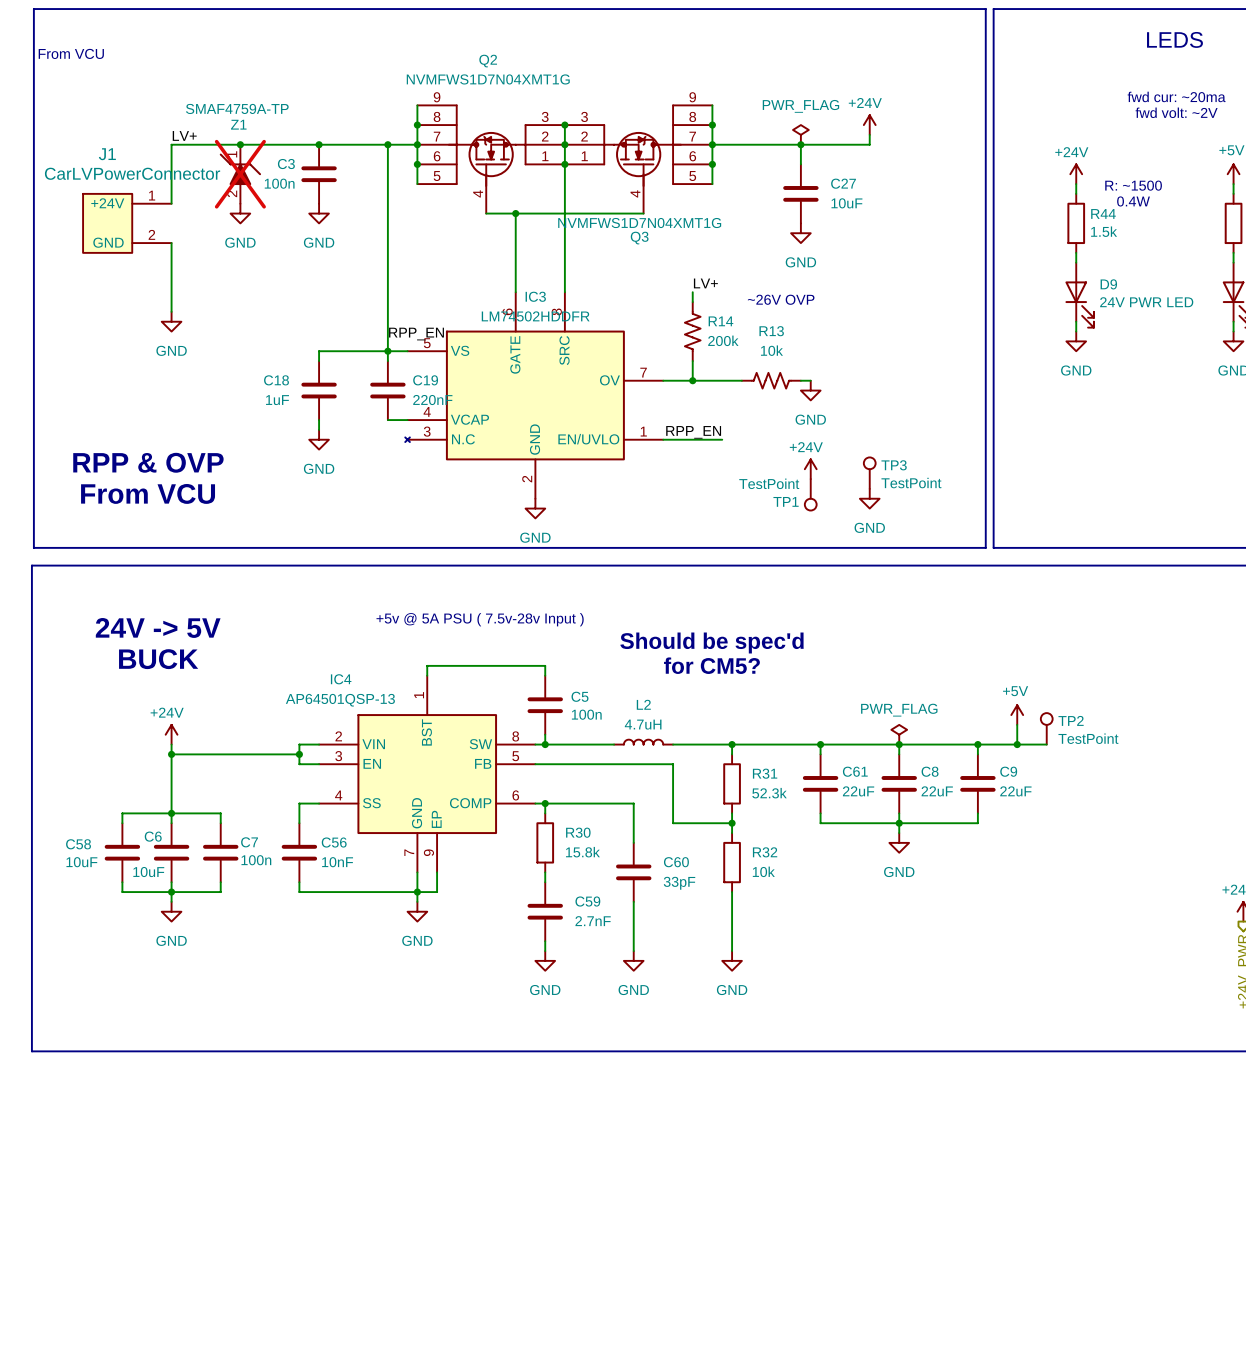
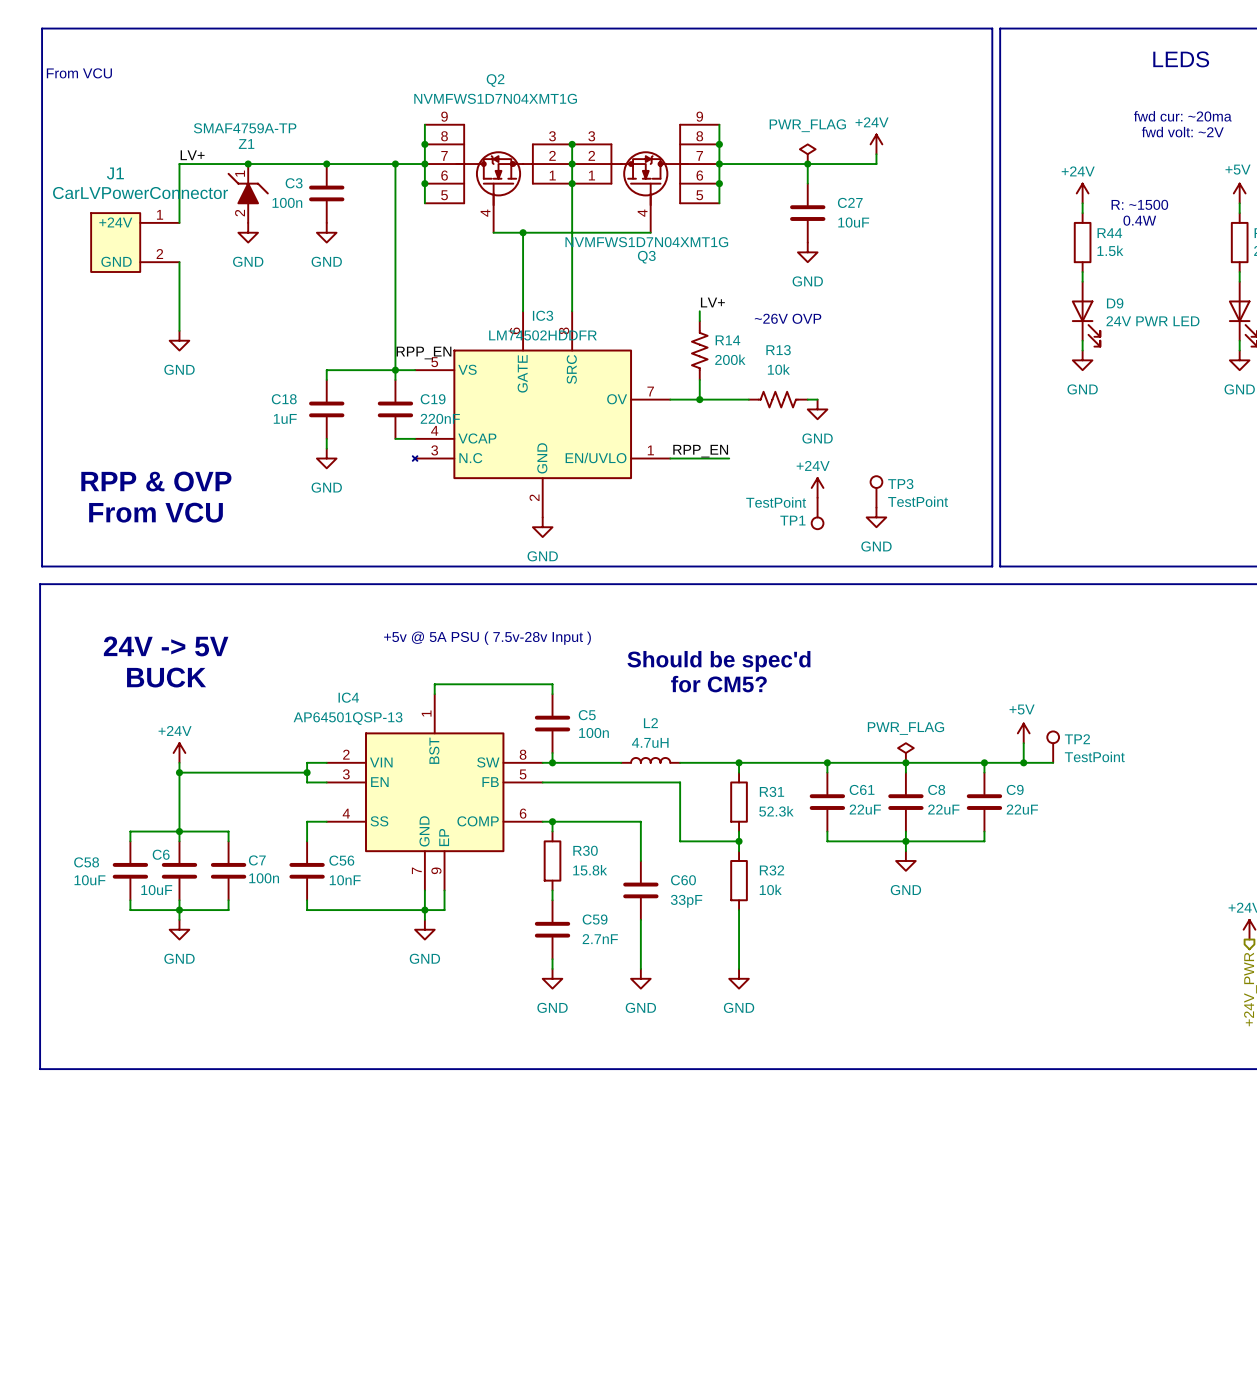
Z1 do-not-place cross: (240, 174) -> none

